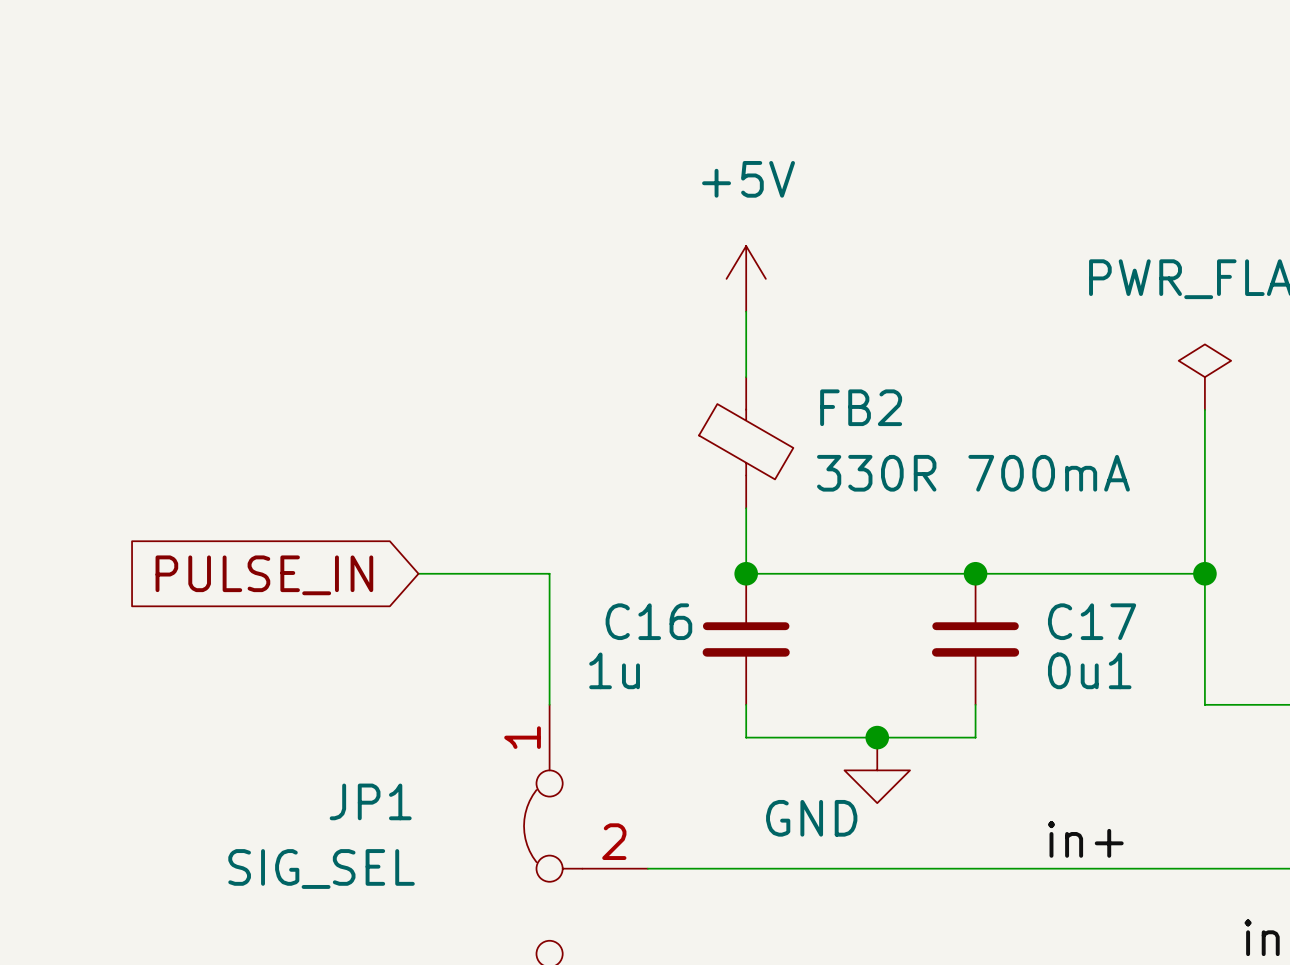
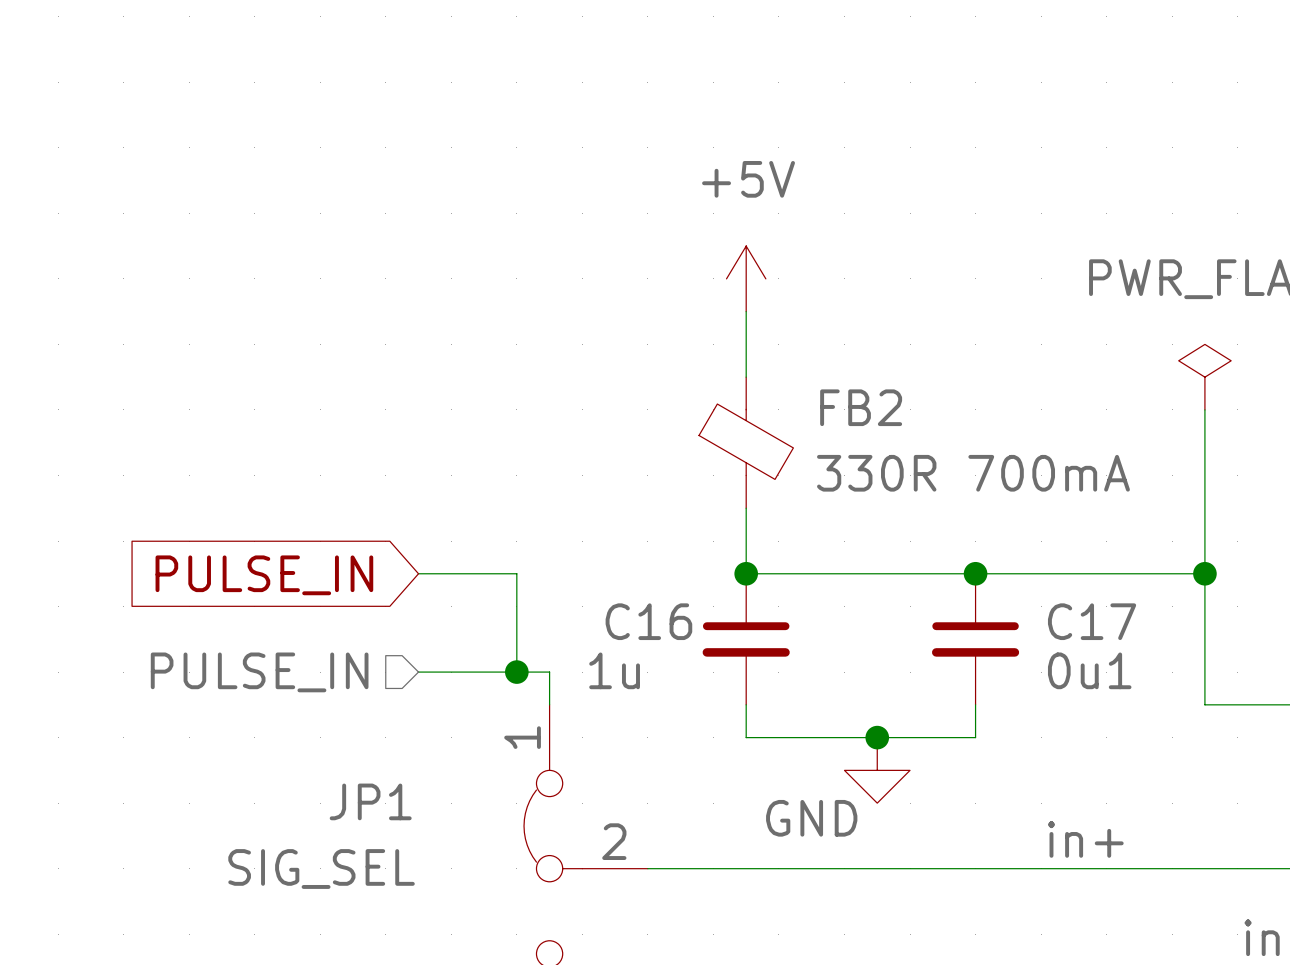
wire: (516, 573) (549, 573) (549, 672) -> (516, 573) (516, 672)
hierarchical label: none -> PULSE_IN (259, 672)
wire: none -> (418, 672) (549, 672)
junction: none -> (516, 672)

